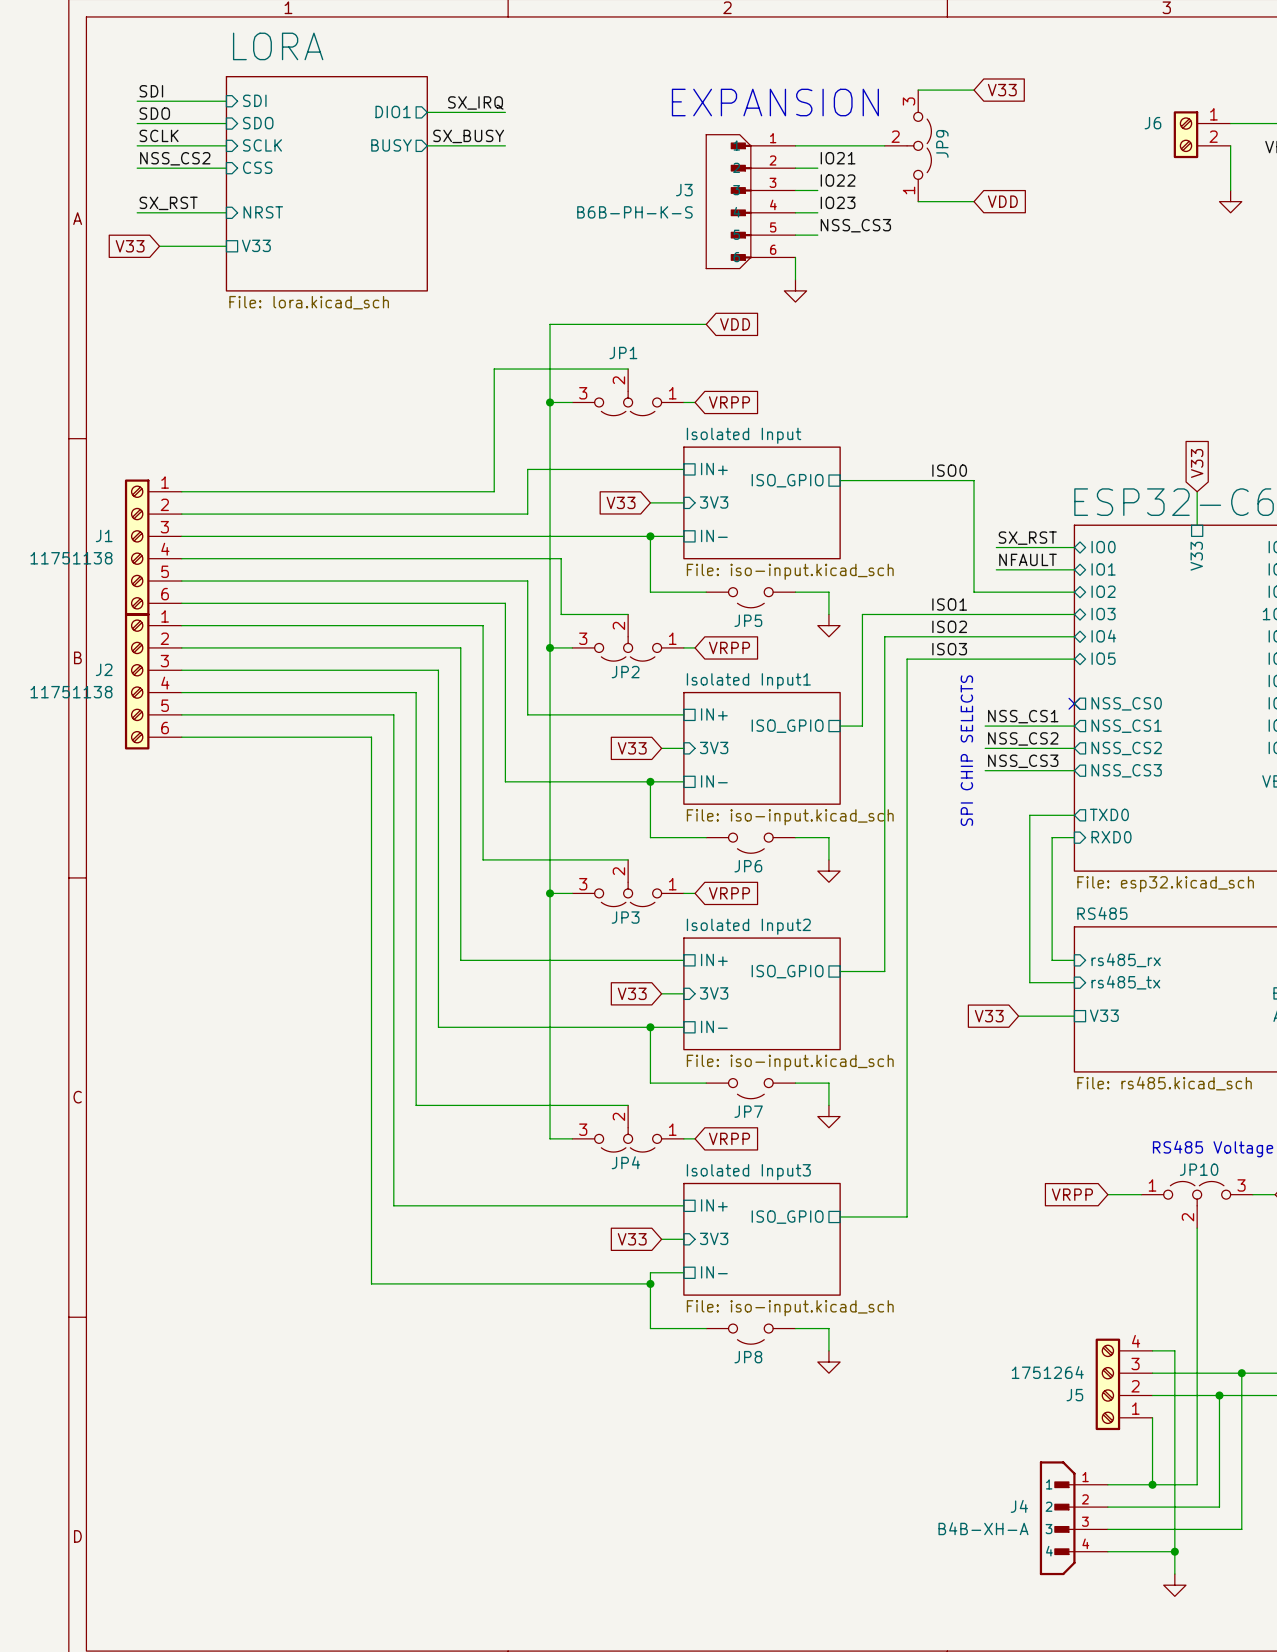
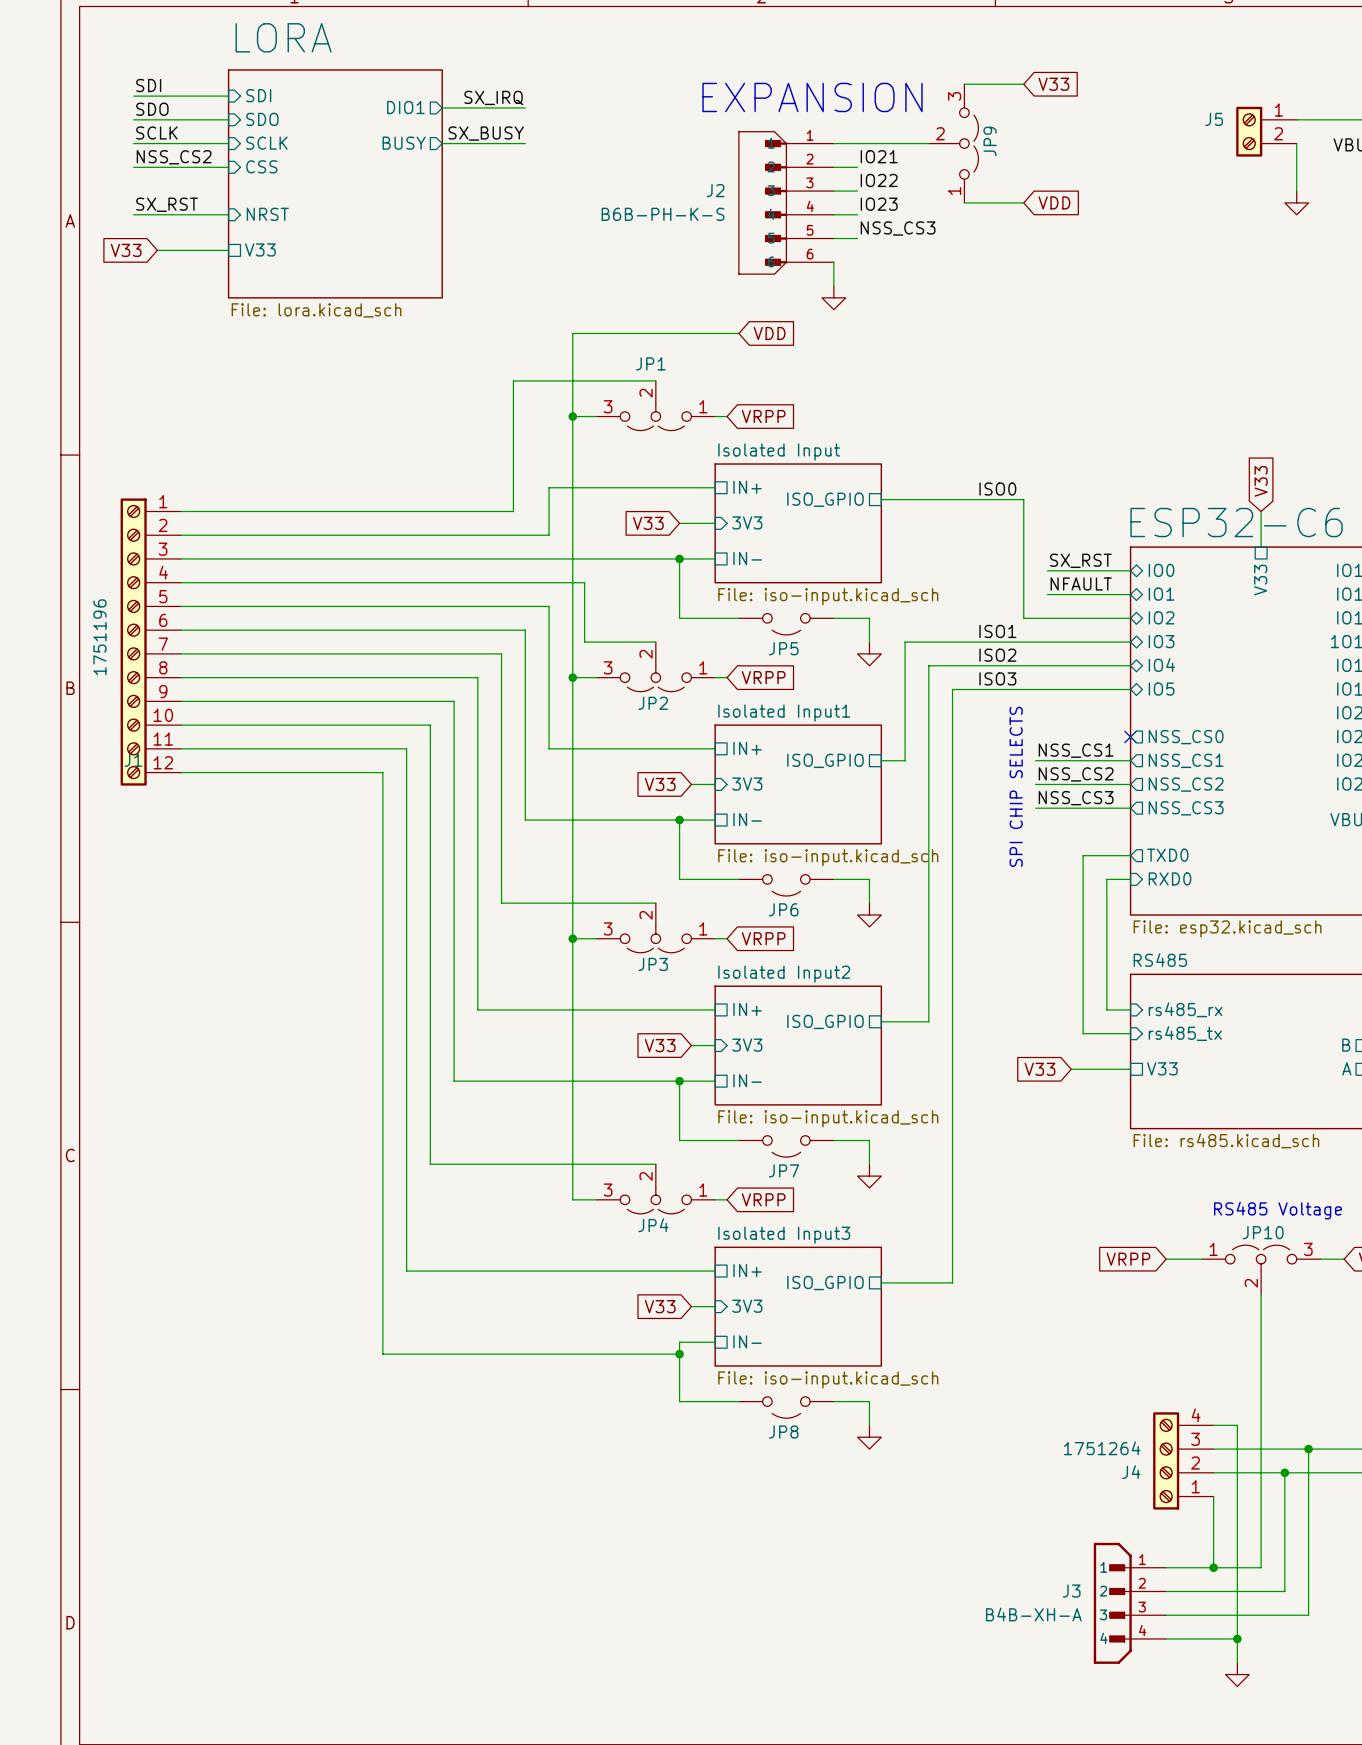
J6 name: J6 (1152, 123) -> J5 (1214, 119)
J3 name: J3 (684, 190) -> J2 (715, 190)
J1 symbol: [124, 479, 182, 616] -> [120, 498, 182, 786]
J1 name position: J1 (104, 535) -> J1 (133, 760)
J1 value: 11751138 (71, 558) -> 1751196 (99, 637)
J2: 11751138 (153, 681) -> none
J5 name: J5 (1074, 1395) -> J4 (1131, 1472)
J4 name: J4 (1019, 1506) -> J3 (1071, 1591)

